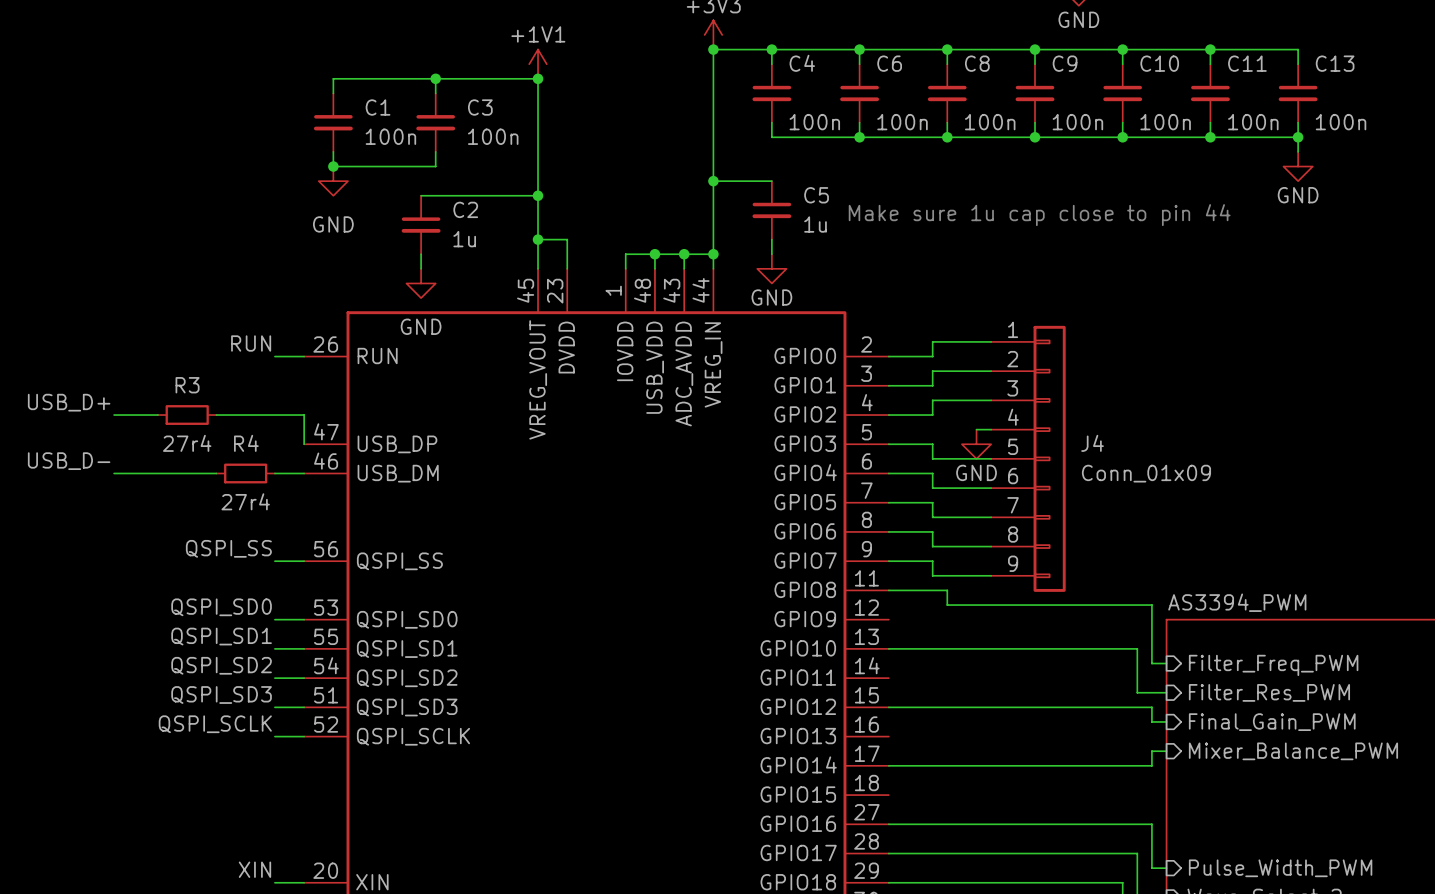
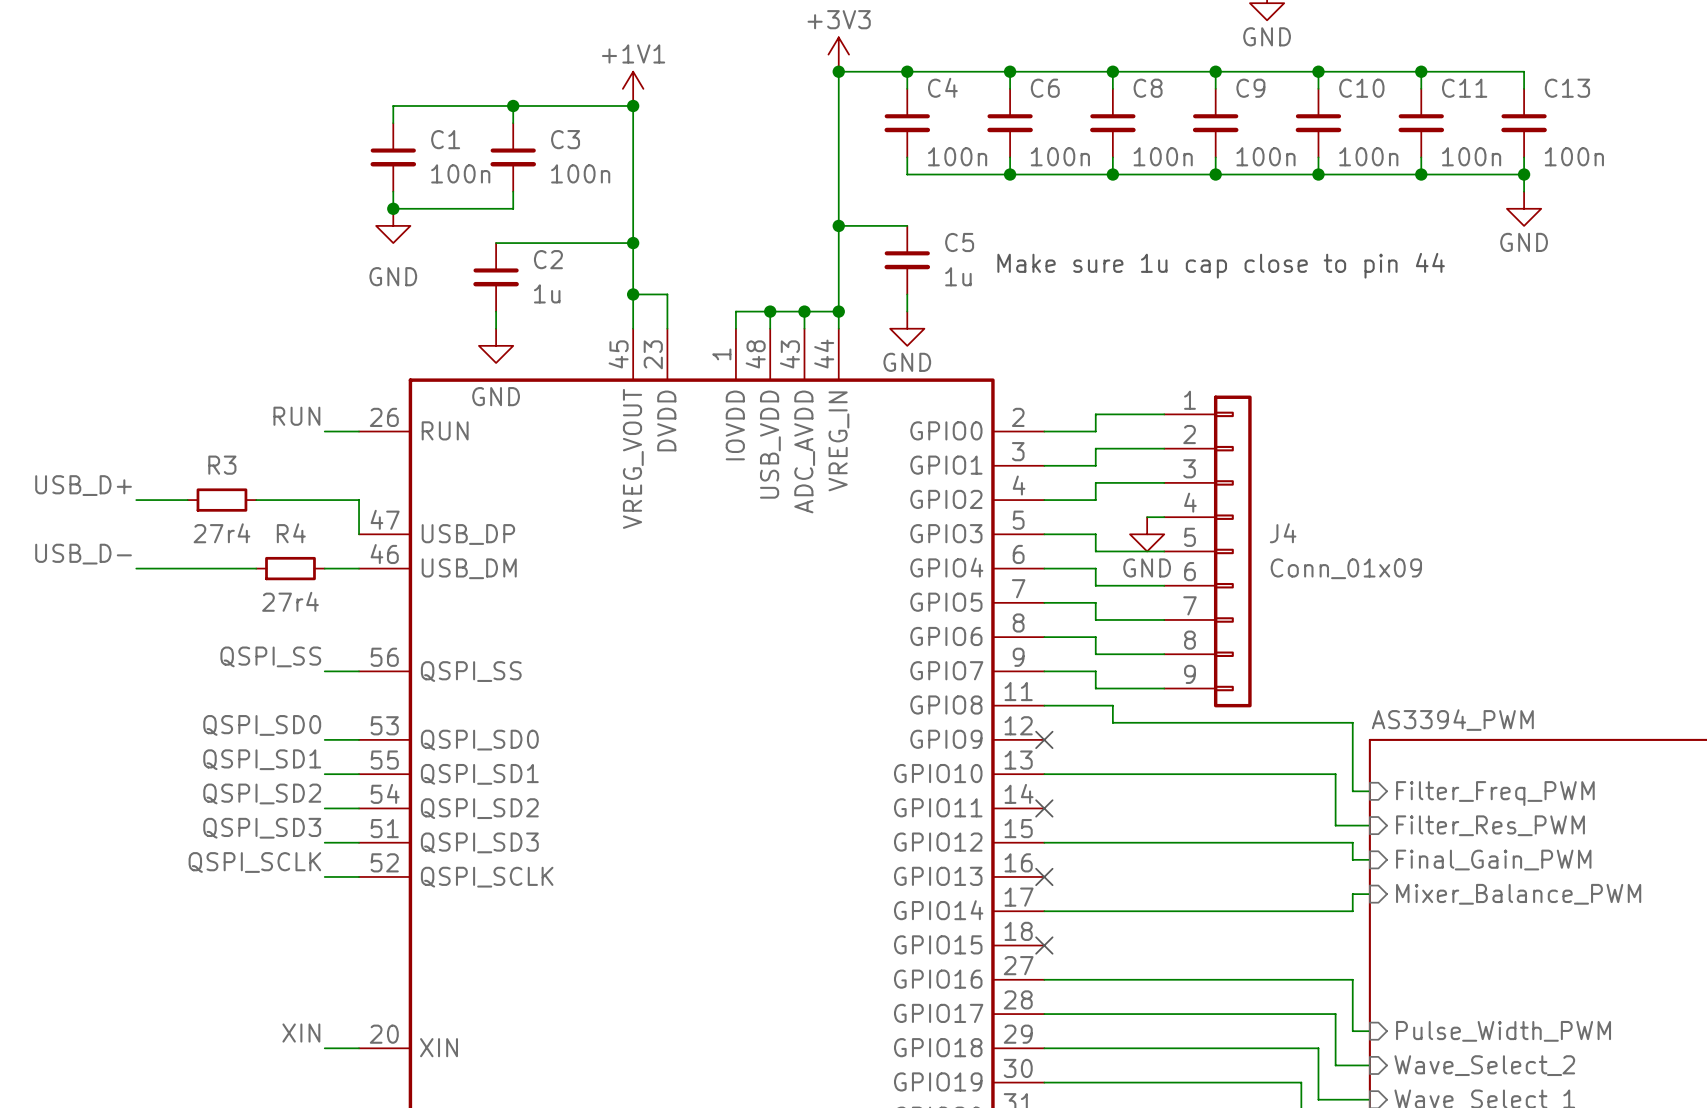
no-connect mark: none -> (1044, 739)
no-connect mark: none -> (1044, 808)
no-connect mark: none -> (1044, 876)
no-connect mark: none -> (1044, 945)

